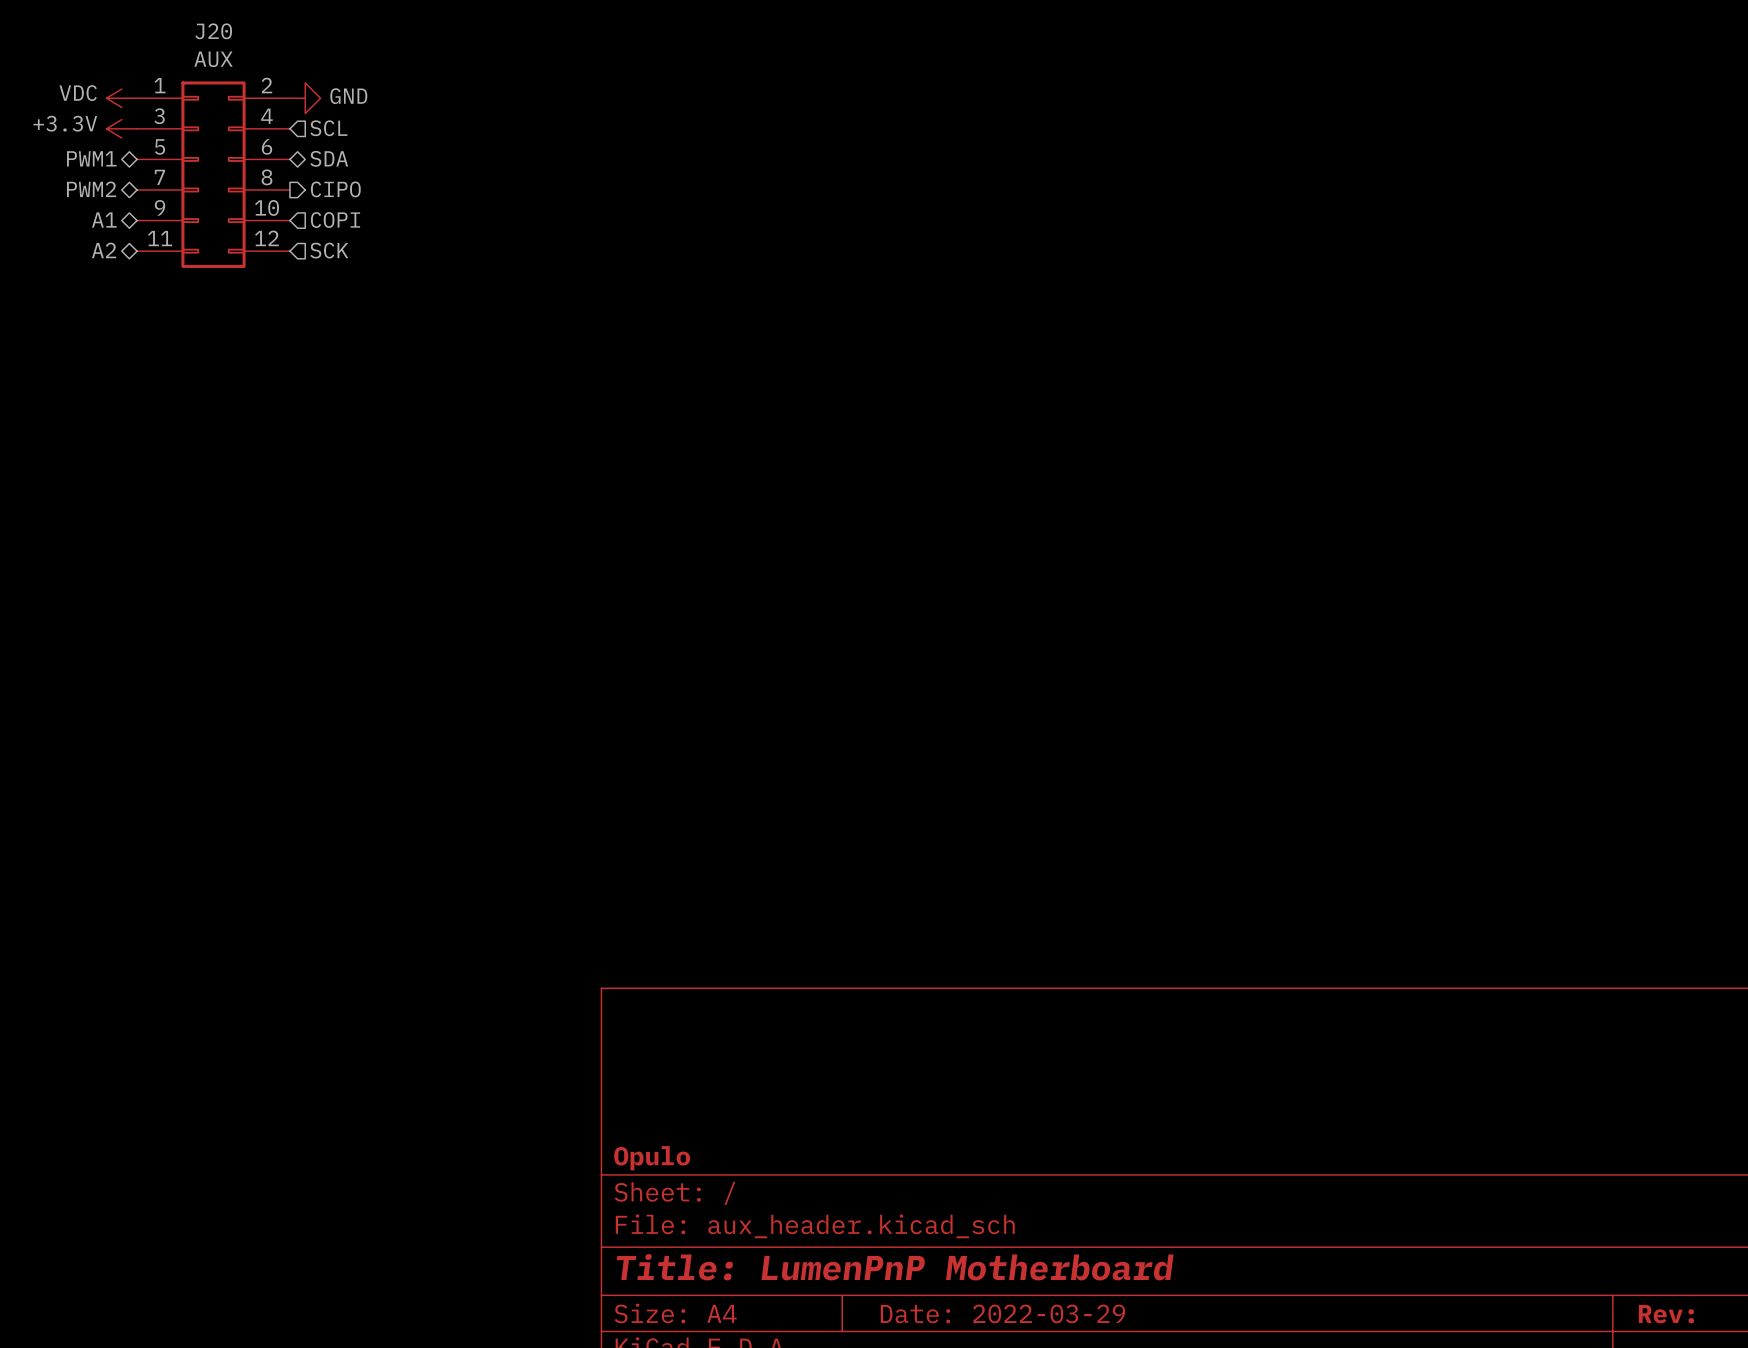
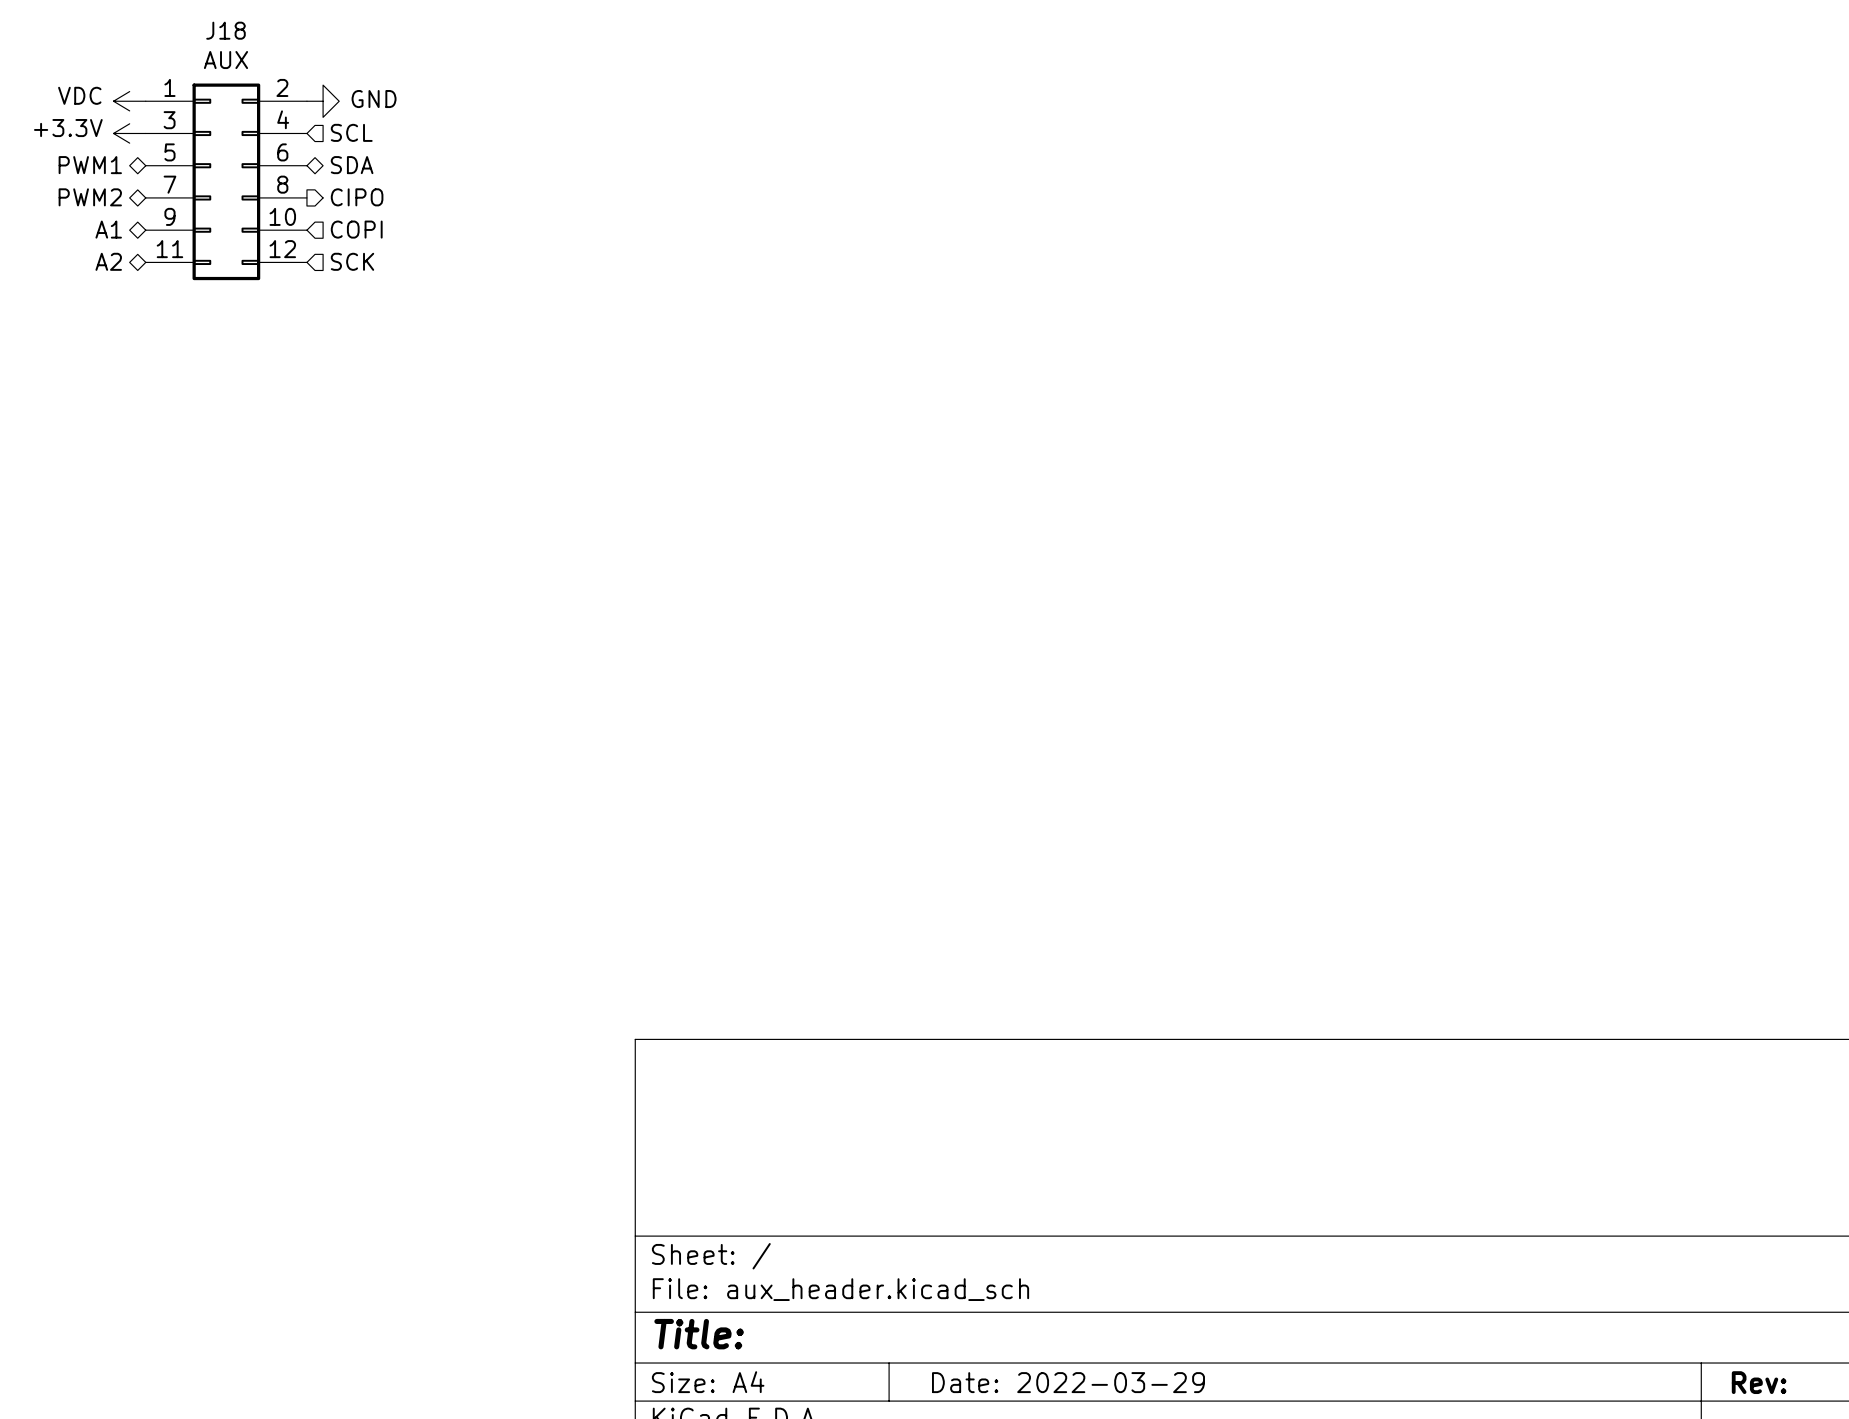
J20 name: J20 (213, 31) -> J18 (225, 30)
title block: Opulo (652, 1158) -> none
title block: Title: LumenPnP Motherboard (895, 1267) -> Title: (699, 1334)

